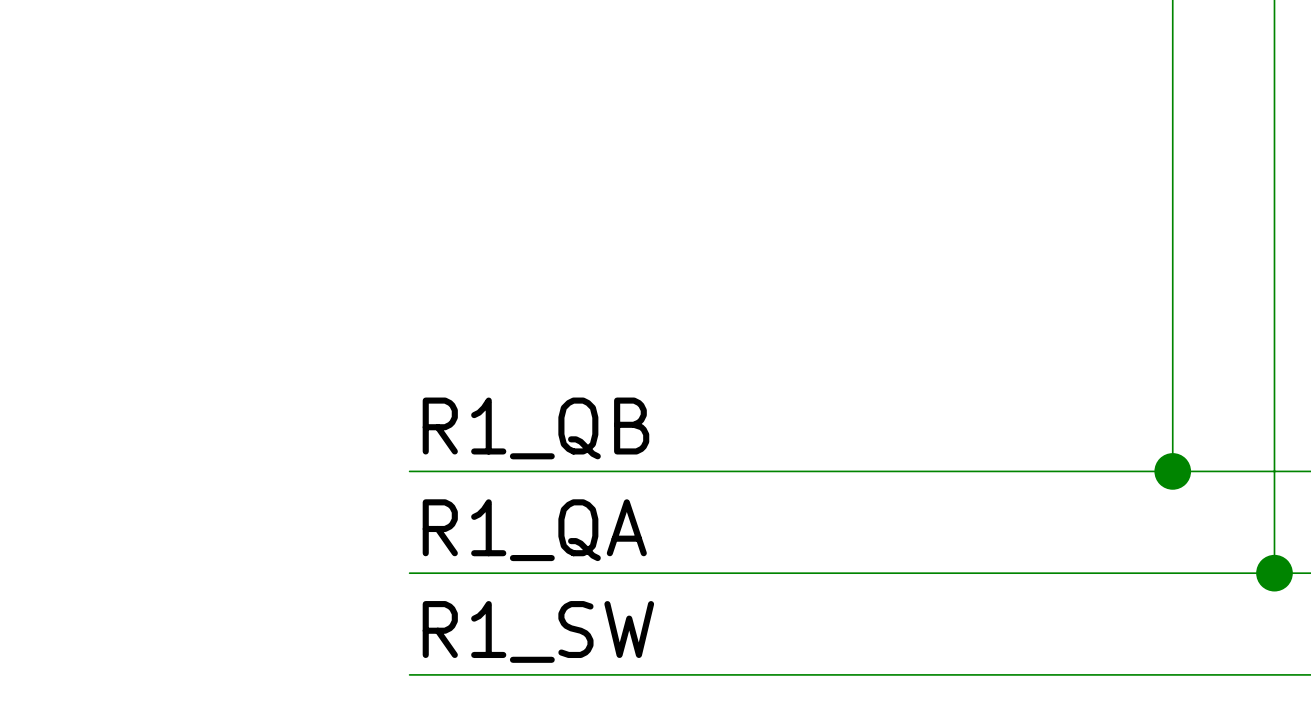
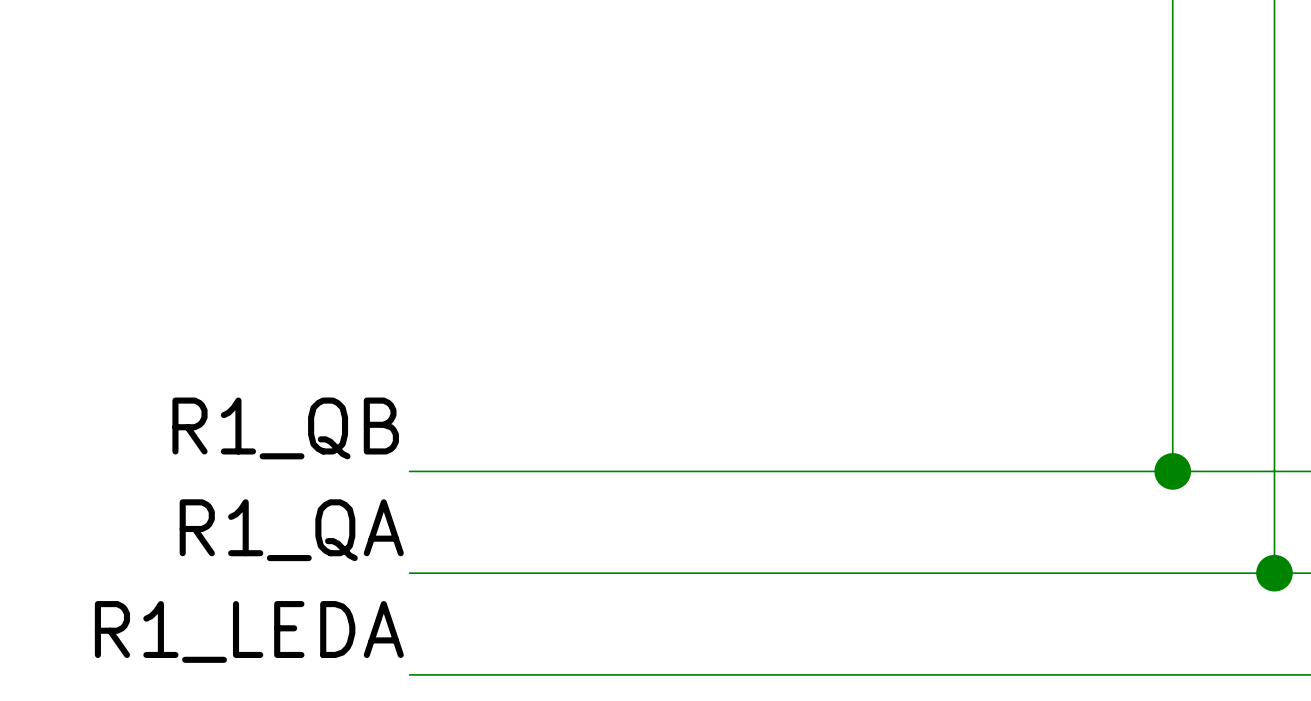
label position: R1_QB (535, 428) -> R1_QB (285, 428)
label position: R1_QA (534, 530) -> R1_QA (291, 530)
label: R1_SW (538, 631) -> R1_LEDA (249, 631)

